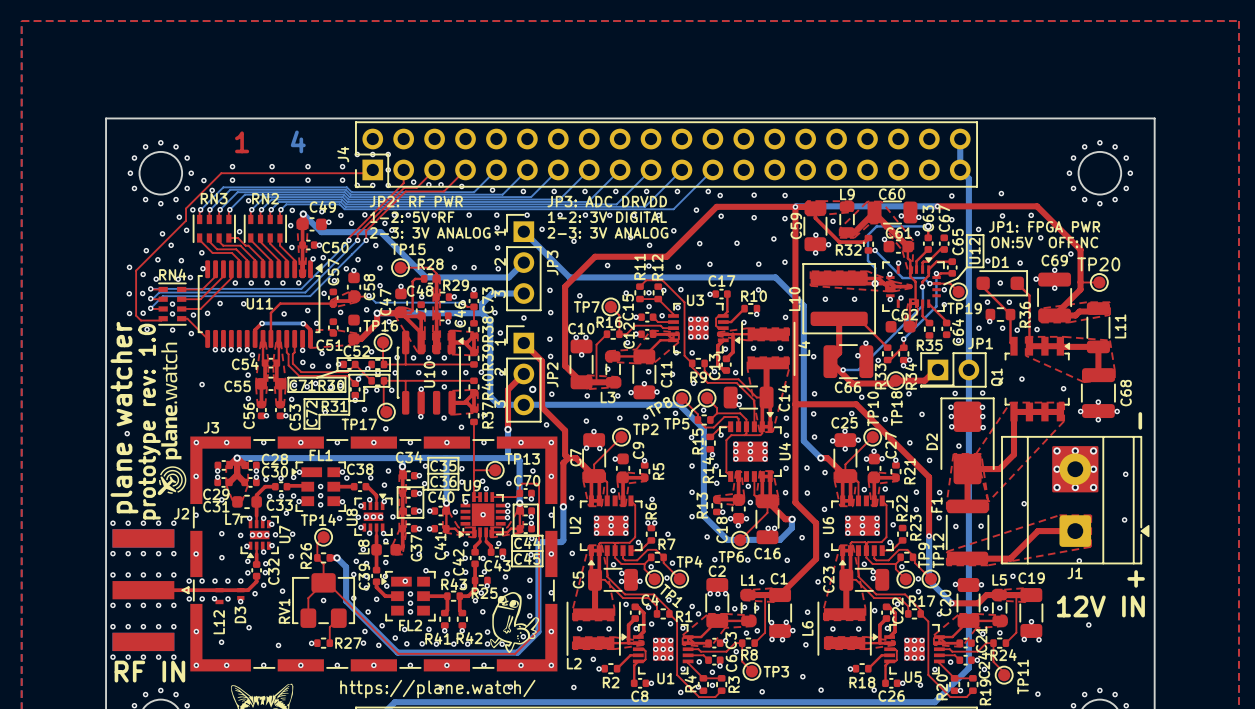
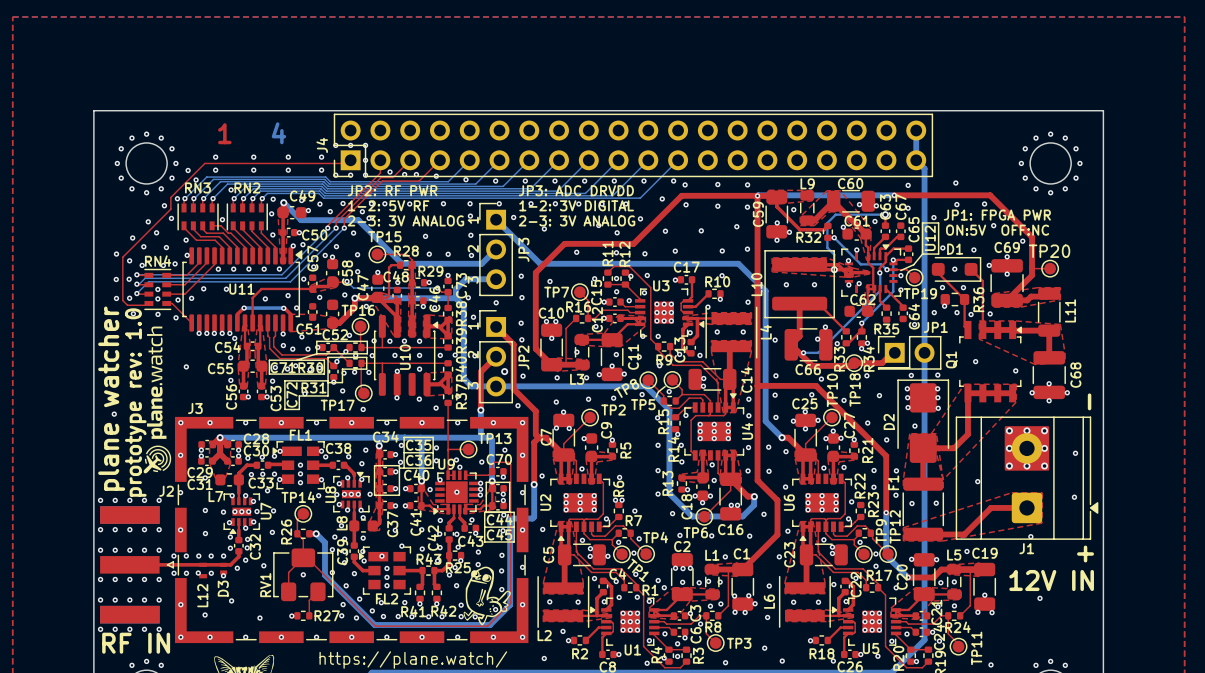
via: (510, 687) -> none
via: (441, 688) -> none

